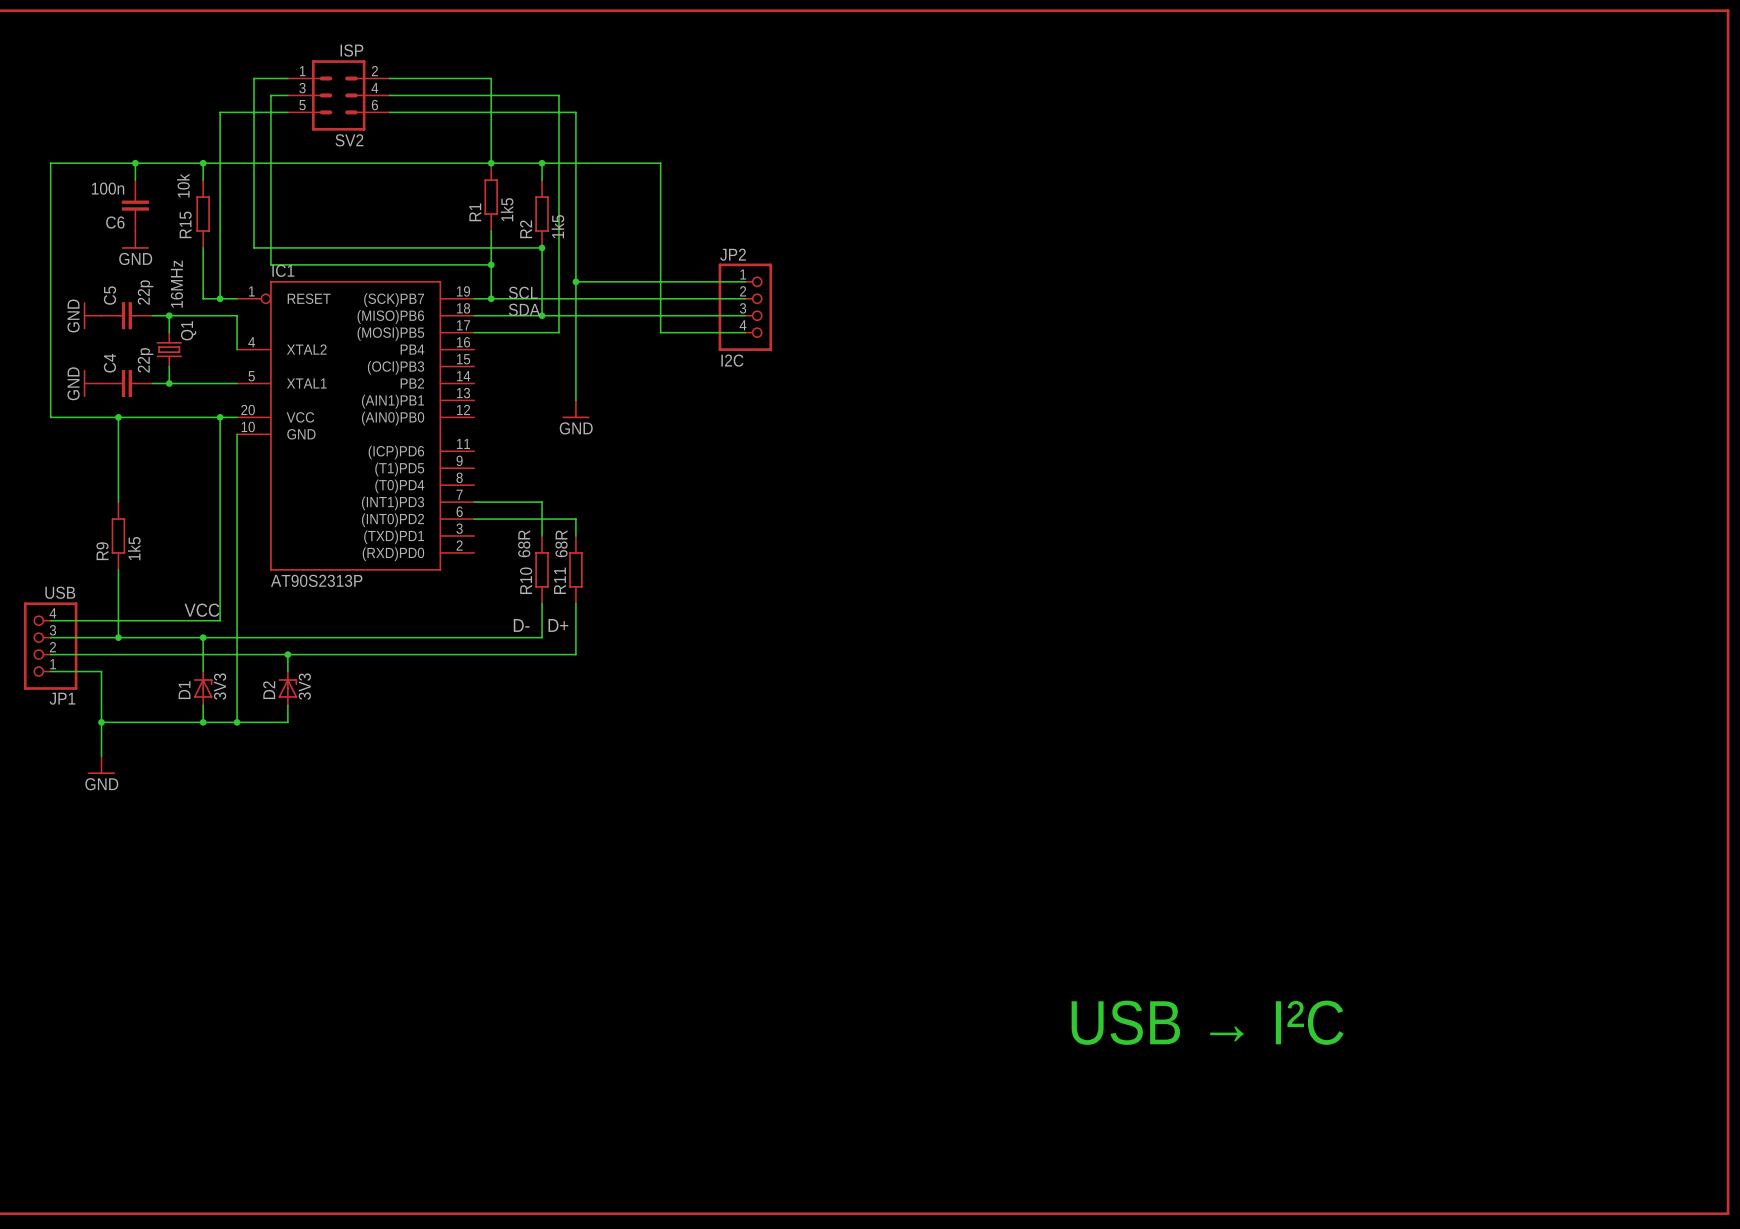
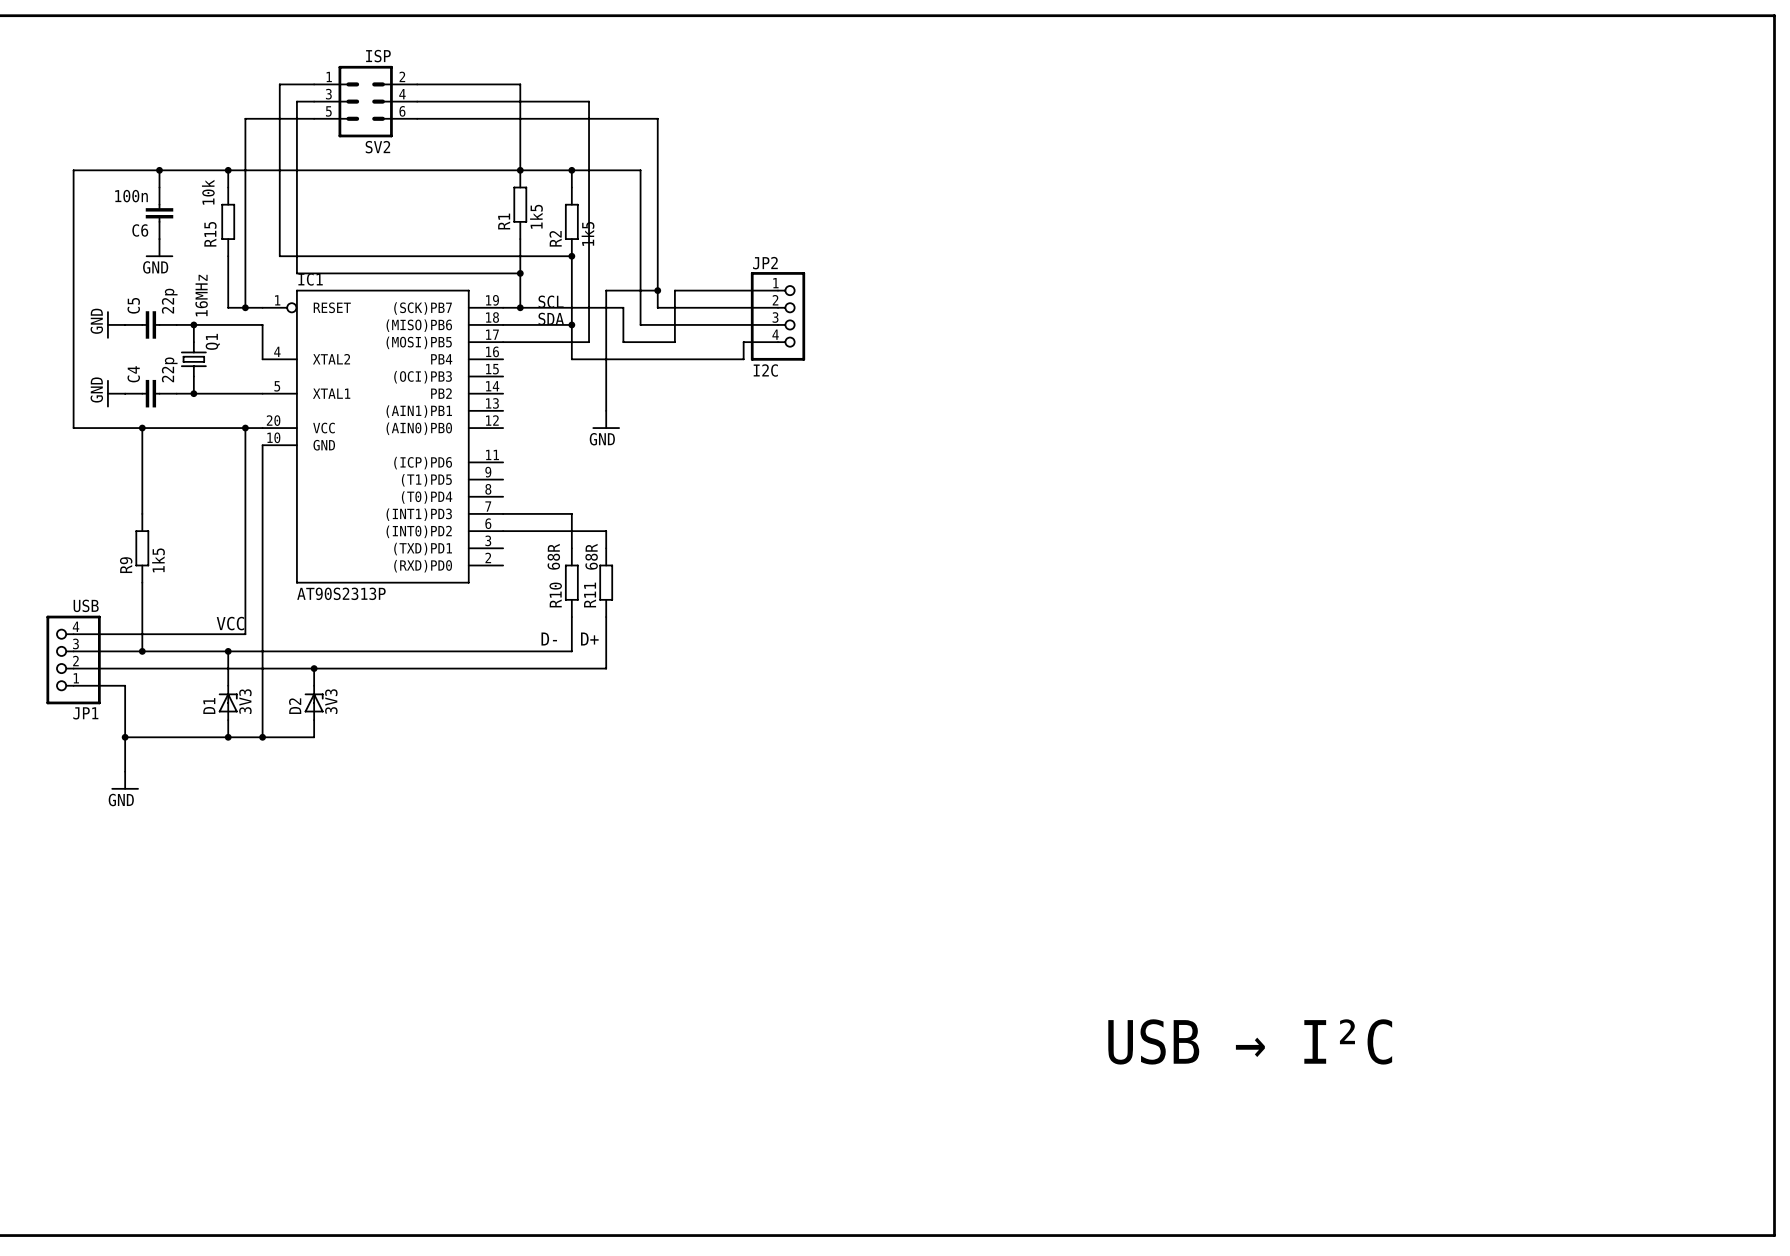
wire: (575, 112) (575, 281) -> (606, 118) (657, 118) (657, 307)
wire: (609, 163) (660, 163) (660, 332) (711, 332) -> (640, 170) (640, 324)
junction: (575, 281) -> none
wire: (626, 281) (643, 281) -> none
junction: none -> (657, 290)
wire: (592, 298) (626, 298) -> (623, 307) (623, 342) (674, 342) (674, 290)
wire: (542, 315) (609, 315) -> (571, 324) (571, 359) (743, 359) (743, 342)

